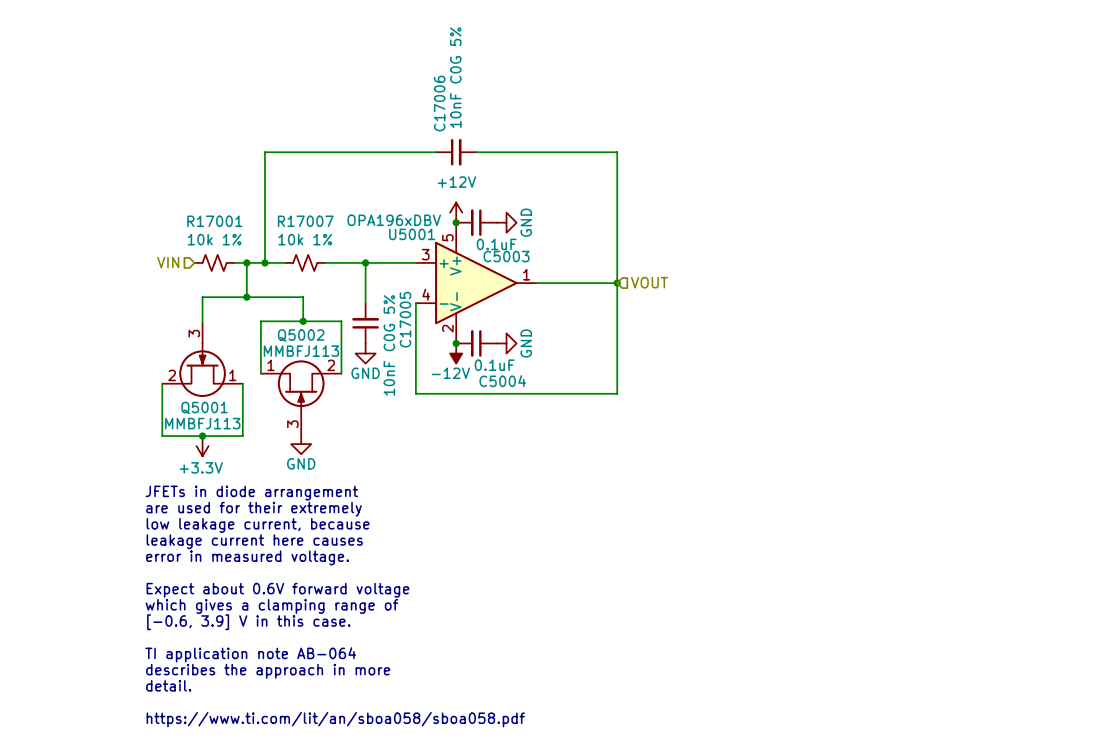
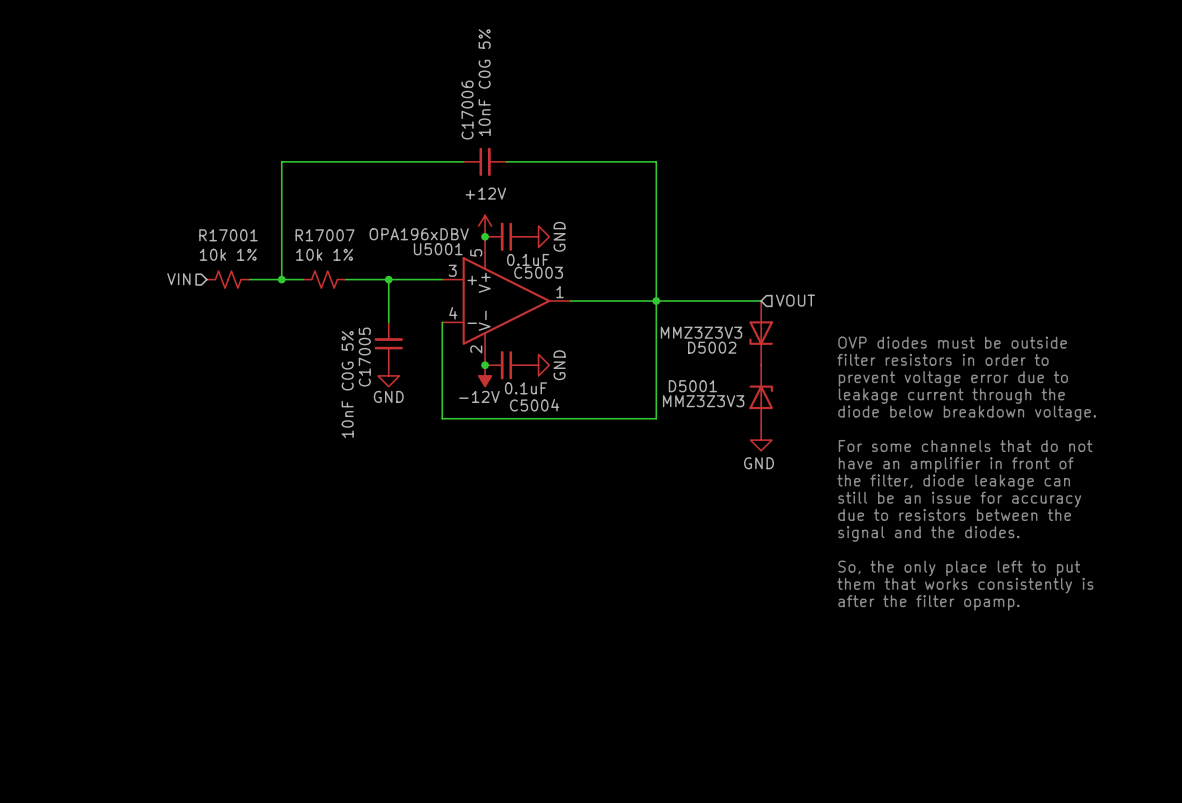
wire: (246, 262) (246, 297) -> none
junction: (246, 262) -> none
hierarchical label position: VOUT (649, 282) -> VOUT (795, 300)
wire: none -> (656, 300) (761, 300)
junction: (246, 297) -> none
D5002: none -> MMZ3Z3V3 (761, 333)
C17005 name position: C17005 (405, 319) -> C17005 (364, 357)
wire: (303, 321) (303, 297) (202, 297) (202, 323) -> none
junction: (303, 321) -> none
text: none -> OVP diodes must be outside (952, 342)
text: none -> filter resistors in order to (942, 359)
C17005 value position: 10nF C0G 5% (389, 345) -> 10nF C0G 5% (347, 384)
text: none -> prevent voltage error due to (953, 378)
Q5001: MMBFJ113 (202, 360) -> none
text: none -> leakage current through the (951, 396)
wire: (260, 373) (260, 321) (341, 321) (341, 373) -> none
D5001: none -> MMZ3Z3V3 (761, 397)
wire: (162, 383) (162, 436) (242, 436) (242, 383) -> none
text: none -> diode below breakdown voltage. (967, 413)
Q5002: MMBFJ113 (301, 397) -> none
power symbol: none -> GND (761, 440)
text: none -> For some channels that do not (965, 446)
junction: (202, 436) -> none
text: none -> have an amplifier in front of (956, 465)
power symbol: GND (301, 444) -> none
power symbol: +3.3V (202, 446) -> none
text: none -> the filter, diode leakage can (953, 482)
text: none -> still be an issue for accuracy (959, 499)
text: none -> due to resistors between the (954, 514)
text: JFETs in diode arrangement (251, 493) -> none
text: none -> signal and the diodes. (928, 533)
text: are used for their extremely (254, 509) -> none
text: low leakage current, because (258, 525) -> none
text: none -> So, the only place left to put (959, 568)
text: leakage current here causes (254, 541) -> none
text: none -> them that works consistently is (965, 585)
text: error in measured voltage. (247, 557) -> none
text: none -> after the filter opamp. (928, 602)
text: Expect about 0.6V forward voltage (277, 590) -> none
text: which gives a clamping range of (271, 606) -> none
text: [-0.6, 3.9] V in this case. (248, 622) -> none
text: TI application note AB-064 (250, 654) -> none
text: describes the approach in more (268, 671) -> none
text: detail. (168, 685) -> none
text: https://www.ti.com/lit/an/sboa058/sboa058.pdf (335, 719) -> none

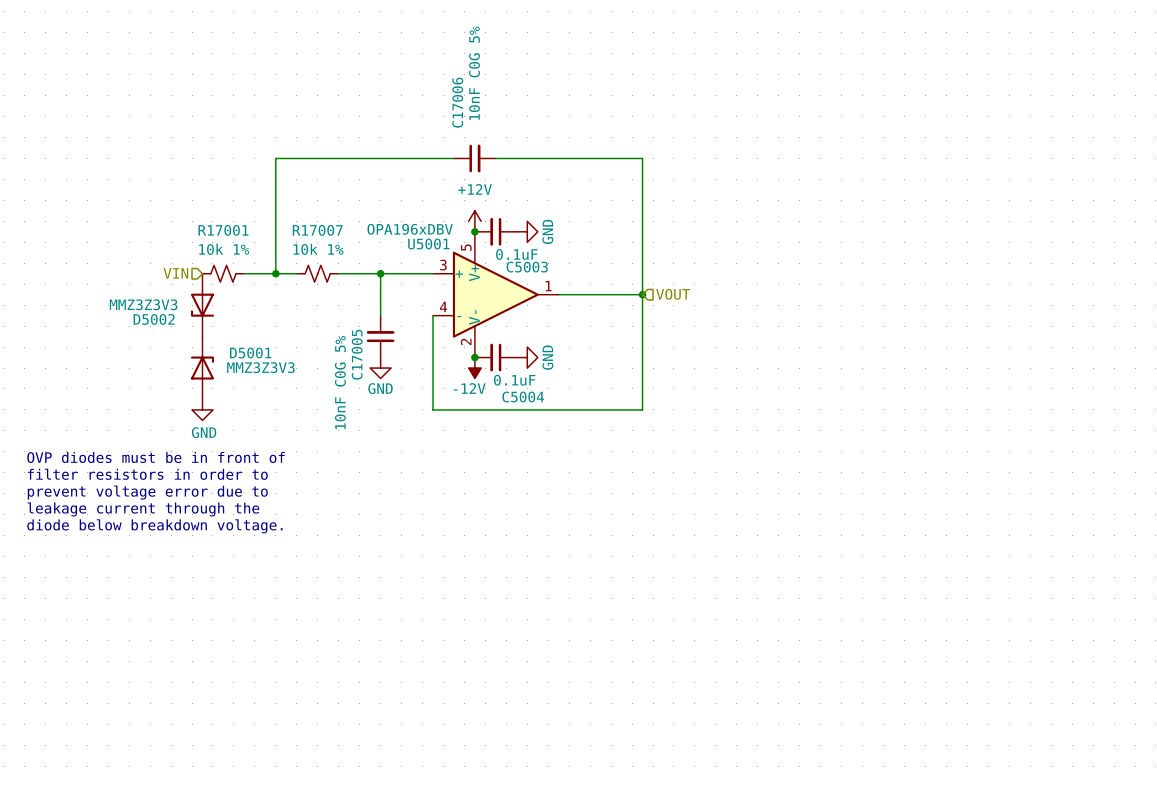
wire: (656, 300) (761, 300) -> none
hierarchical label position: VOUT (795, 300) -> VOUT (673, 294)
D5002 position: (761, 333) -> (202, 305)
text: OVP diodes must be outside (952, 342) -> none
text: filter resistors in order to (942, 359) -> none
text: prevent voltage error due to (953, 378) -> none
D5001 name position: D5001 (692, 386) -> D5001 (250, 352)
text: leakage current through the (951, 396) -> none
D5001 position: (761, 397) -> (202, 368)
D5001 value position: MMZ3Z3V3 (703, 401) -> MMZ3Z3V3 (260, 367)
text: diode below breakdown voltage. (967, 413) -> none
power symbol: none -> GND (202, 409)
power symbol: GND (761, 440) -> none
text: For some channels that do not (965, 446) -> none
text: have an amplifier in front of (956, 465) -> none
text: none -> OVP diodes must be in front of (156, 457)
text: the filter, diode leakage can (953, 482) -> none
text: none -> filter resistors in order to (147, 474)
text: still be an issue for accuracy (959, 499) -> none
text: none -> prevent voltage error due to (147, 492)
text: due to resistors between the (954, 514) -> none
text: none -> leakage current through the (143, 509)
text: signal and the diodes. (928, 533) -> none
text: none -> diode below breakdown voltage. (154, 526)
text: So, the only place left to put (959, 568) -> none
text: them that works consistently is (965, 585) -> none
text: after the filter opamp. (928, 602) -> none

